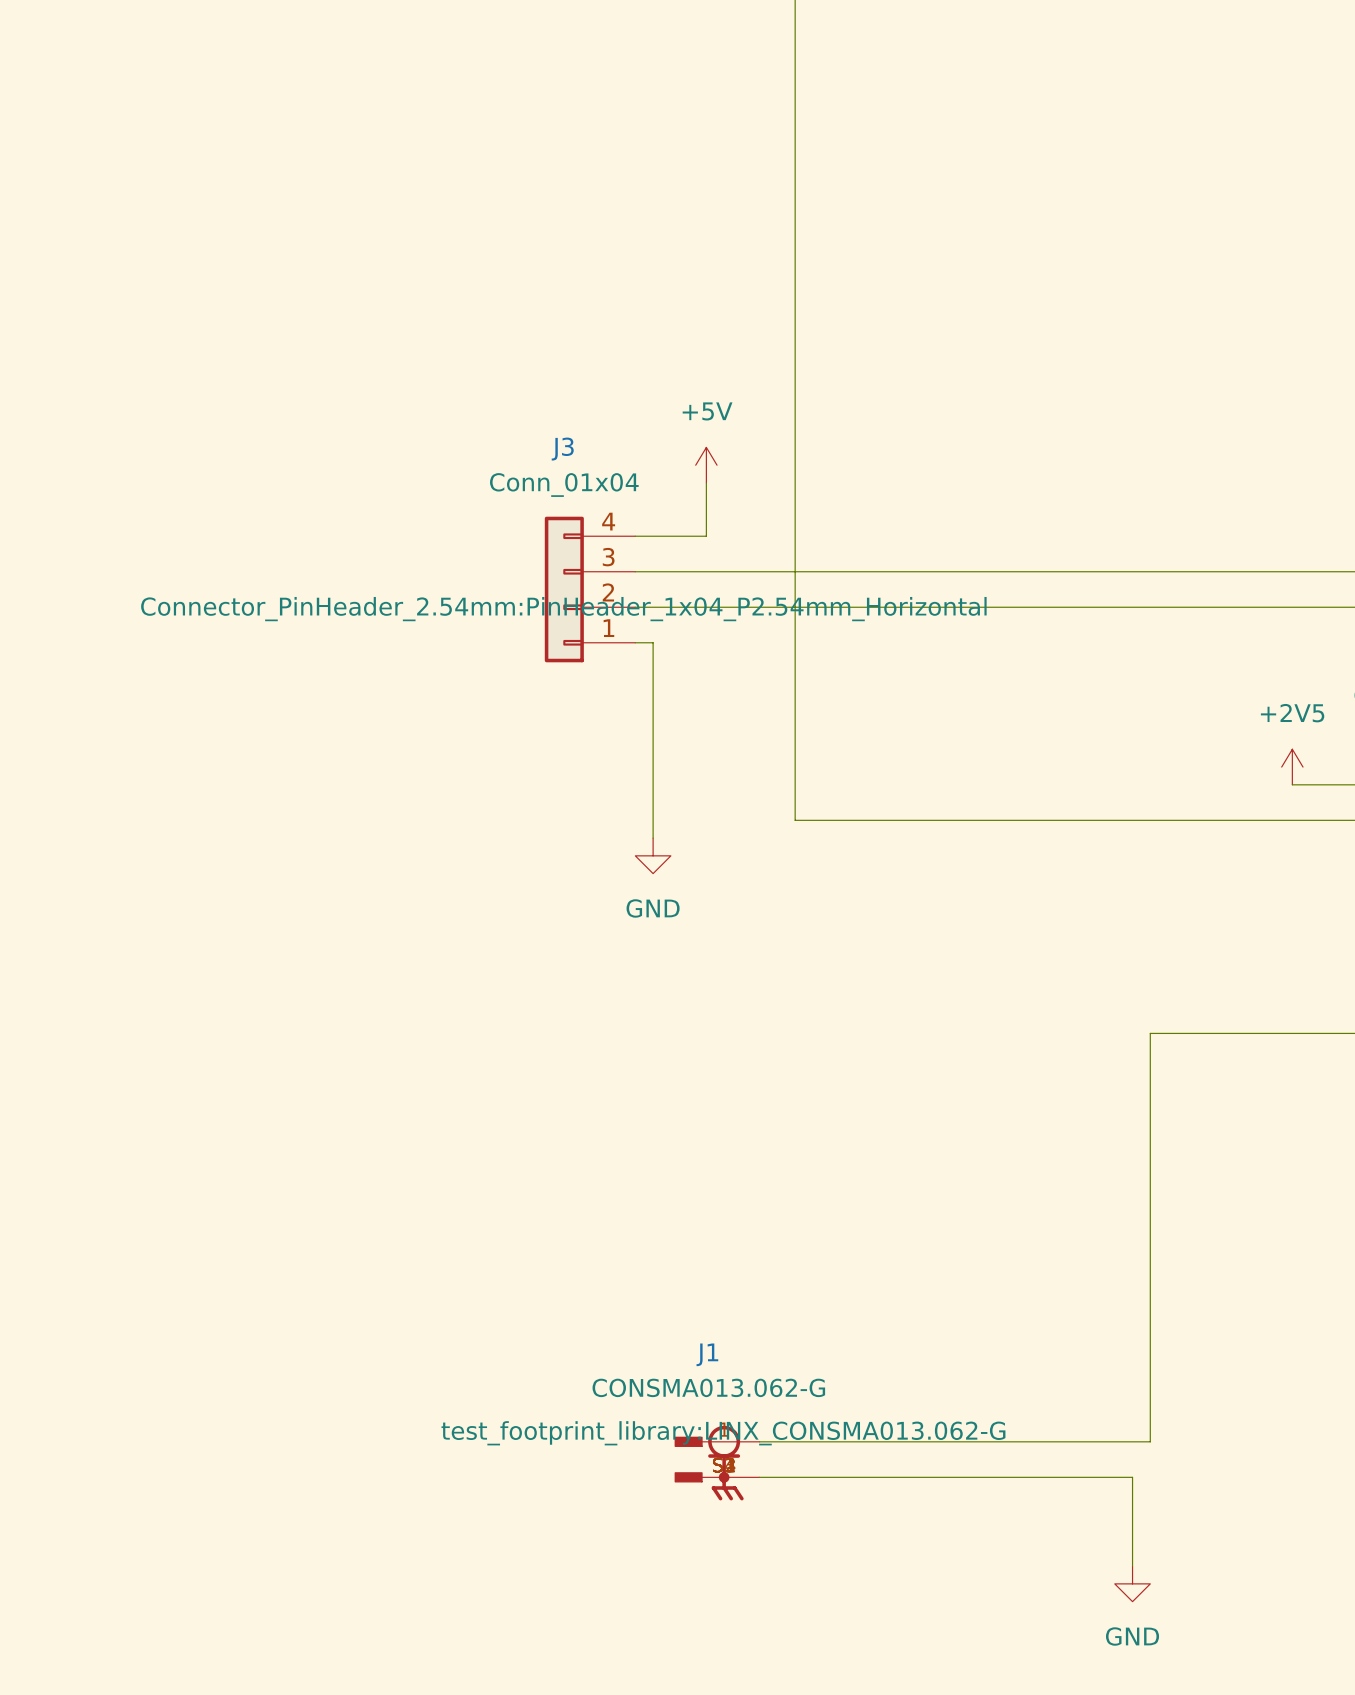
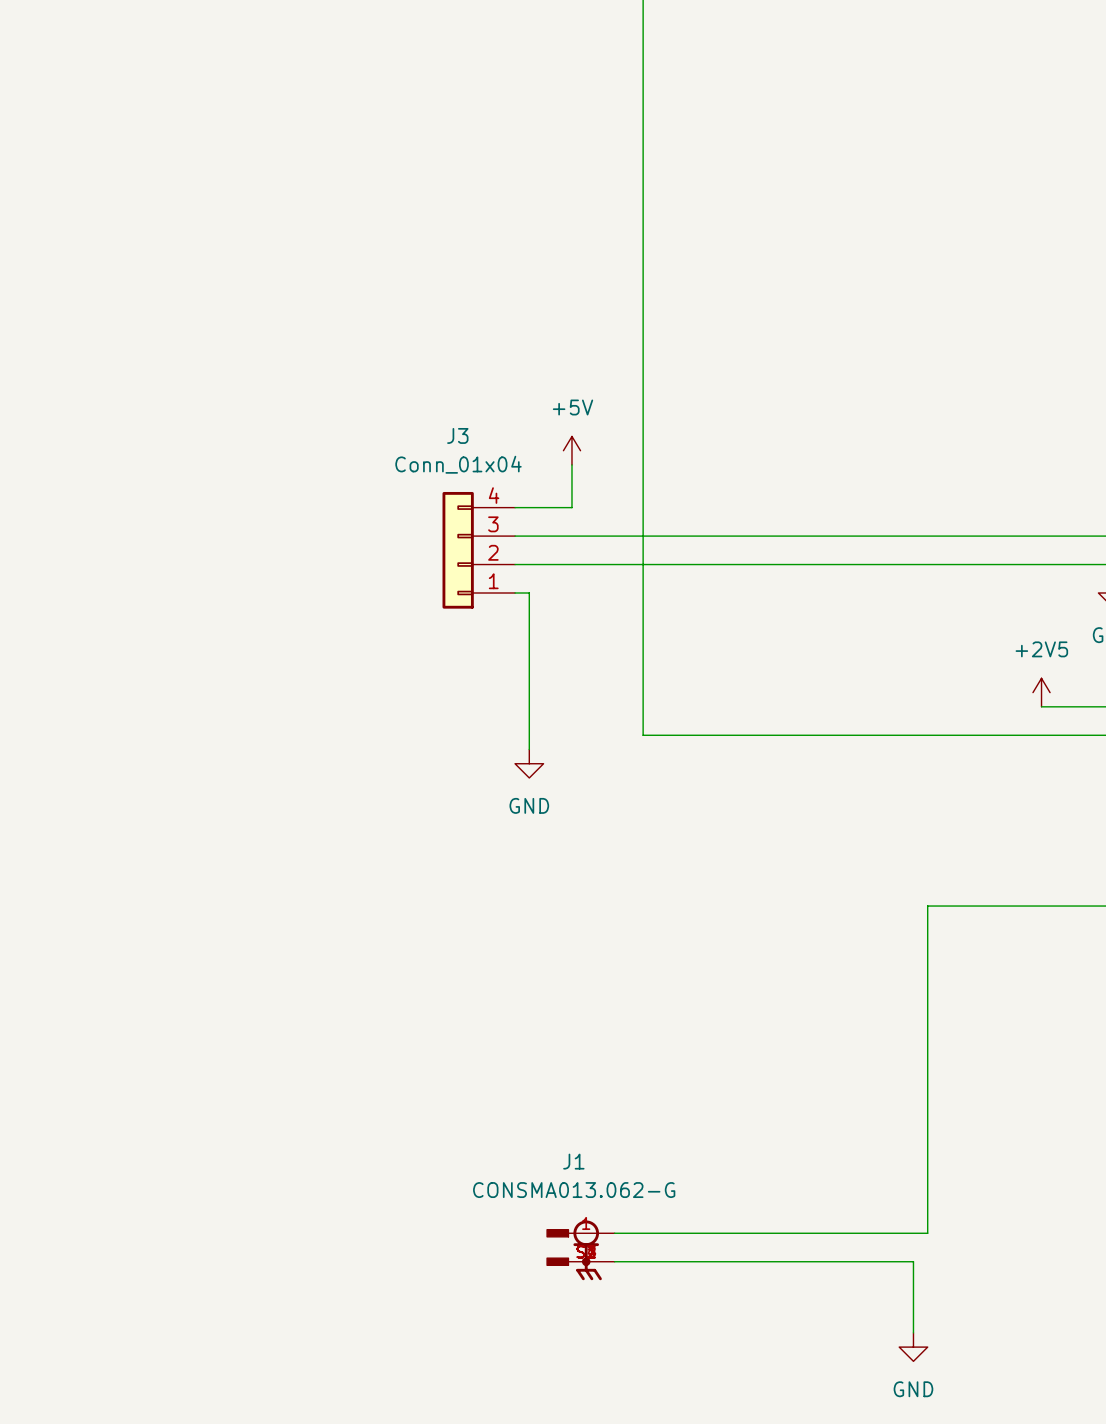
J3 text: Connector_PinHeader_2.54mm:PinHeader_1x04_P2.54mm_Horizontal (563, 609) -> none
J1 text: test_footprint_library:LINX_CONSMA013.062-G (723, 1433) -> none

